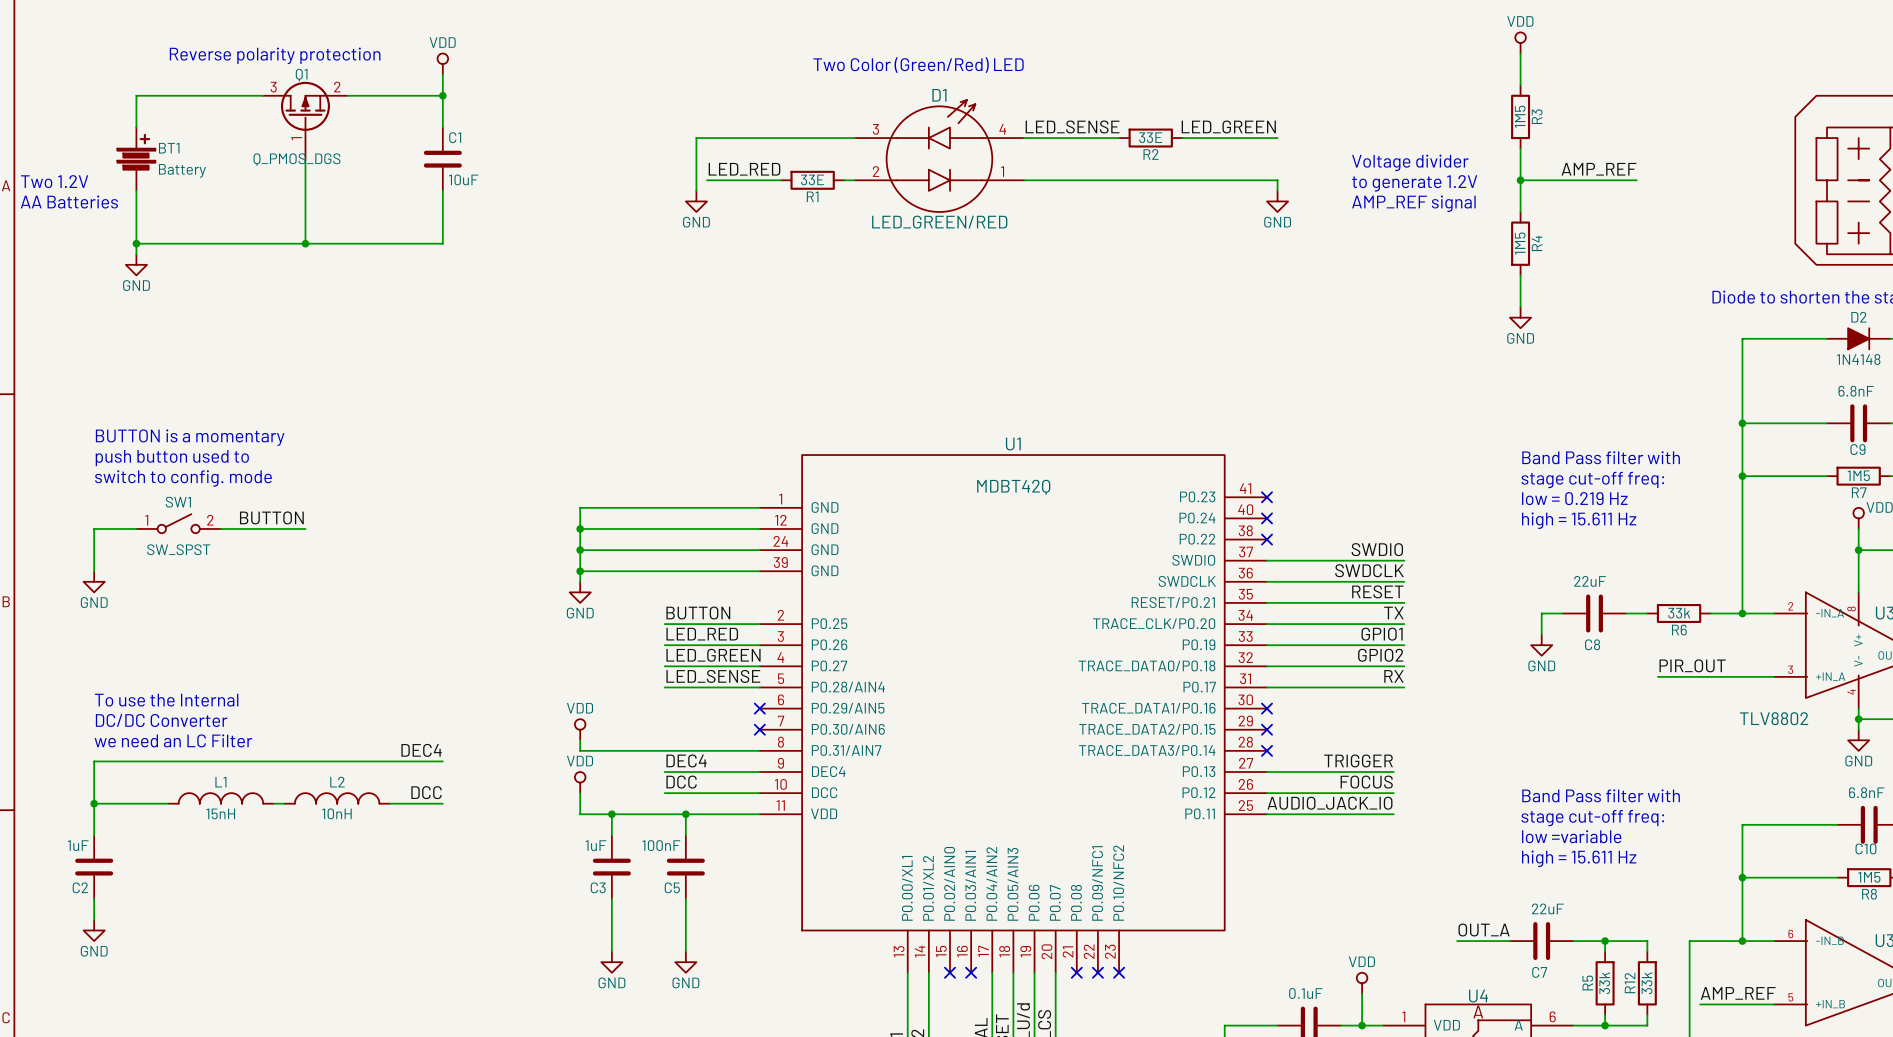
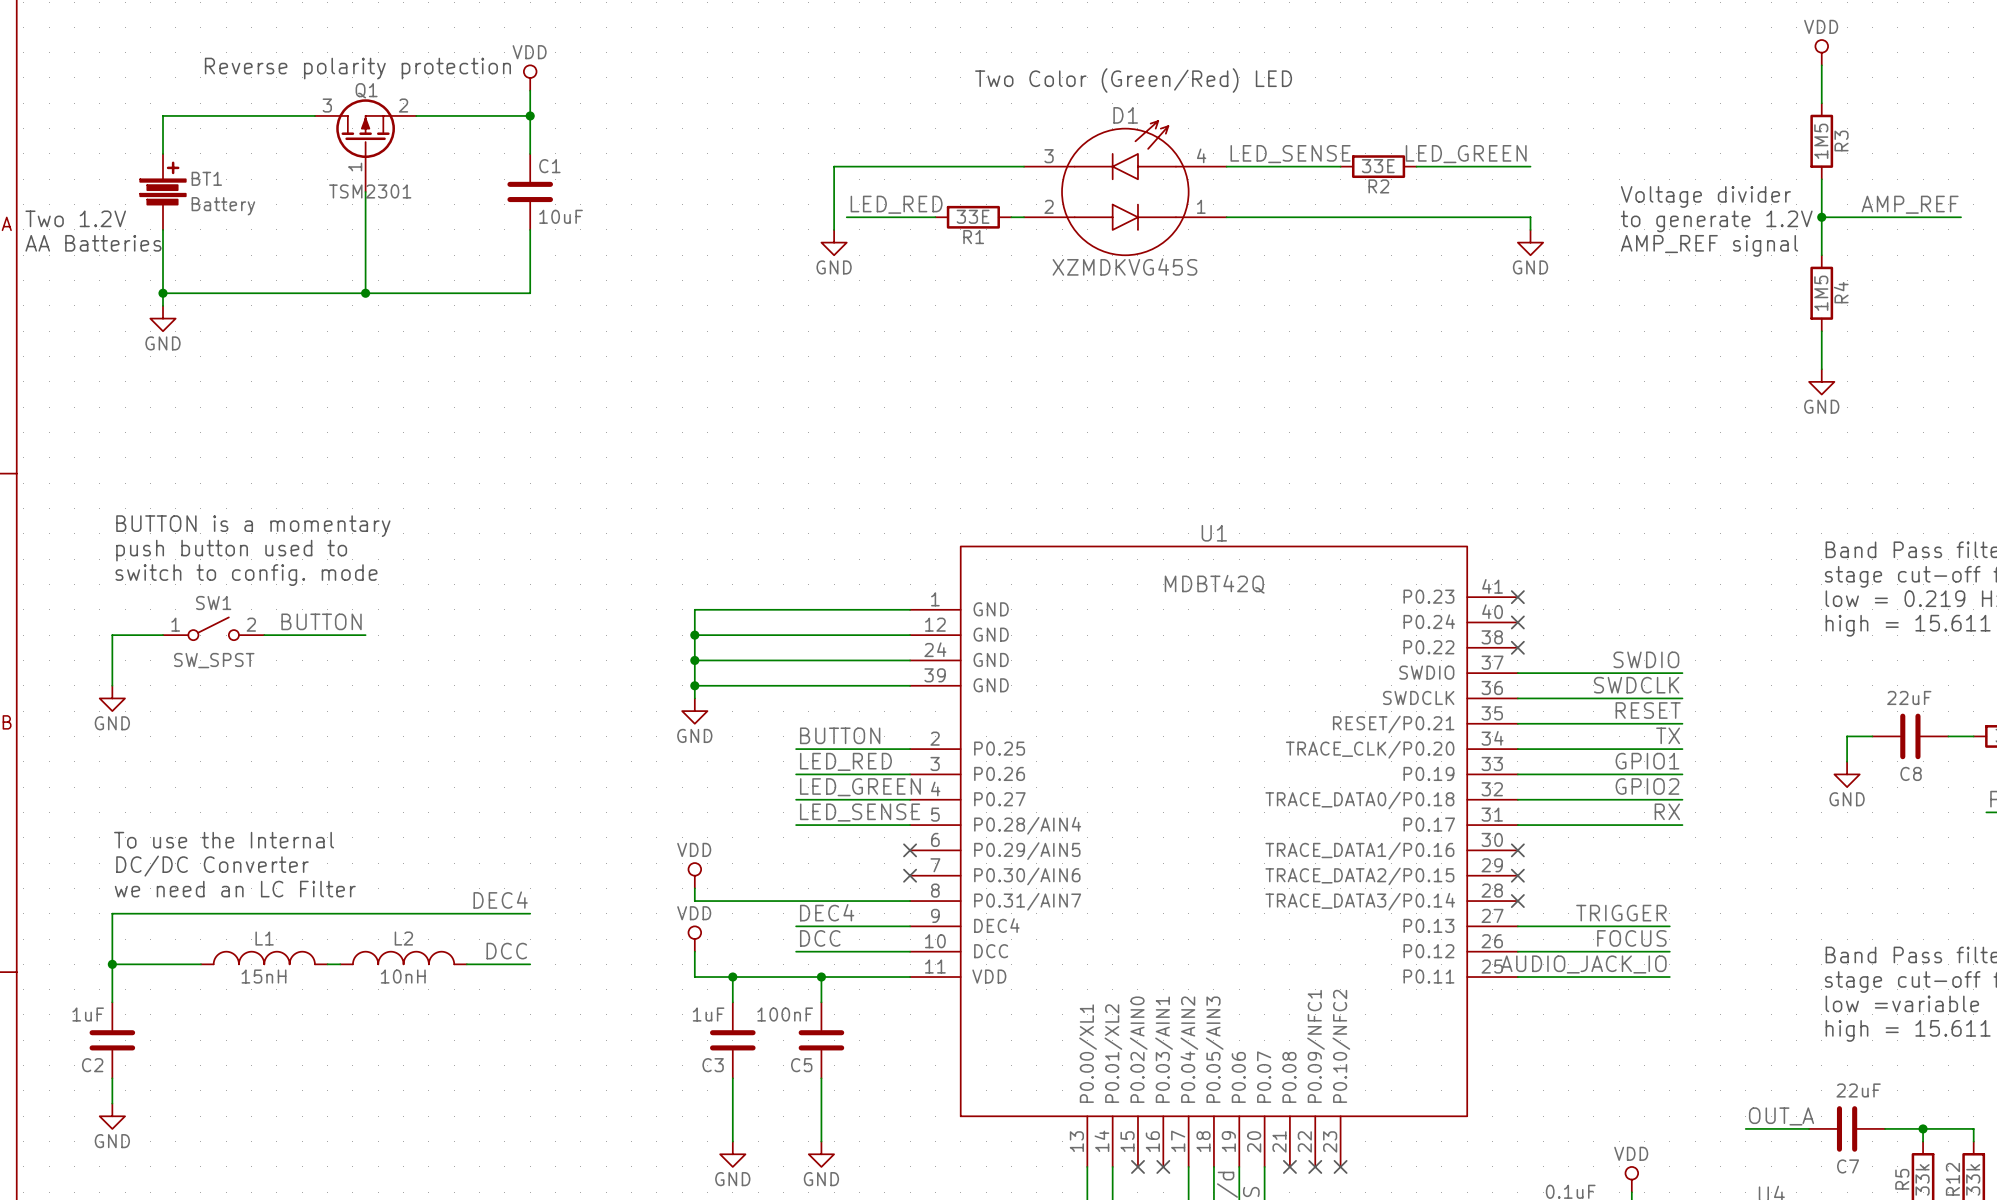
Q1 value: Q_PMOS_DGS (296, 159) -> TSM2301 (370, 191)
D1 value: LED_GREEN/RED (939, 222) -> XZMDKVG45S (1124, 266)

